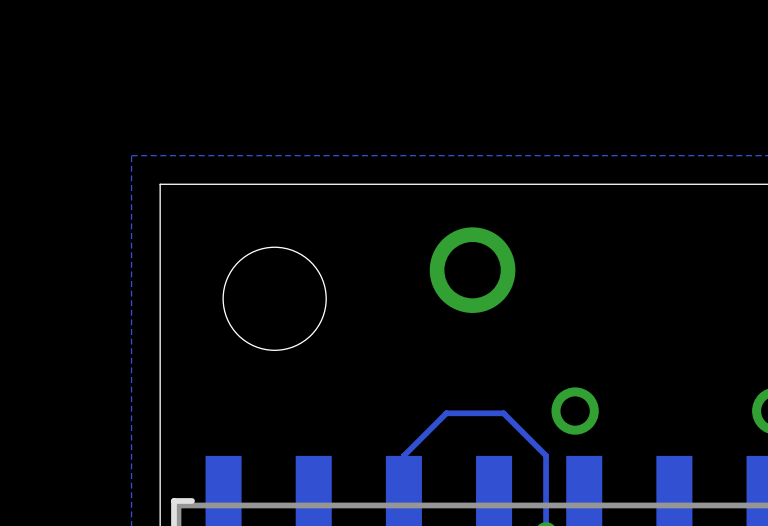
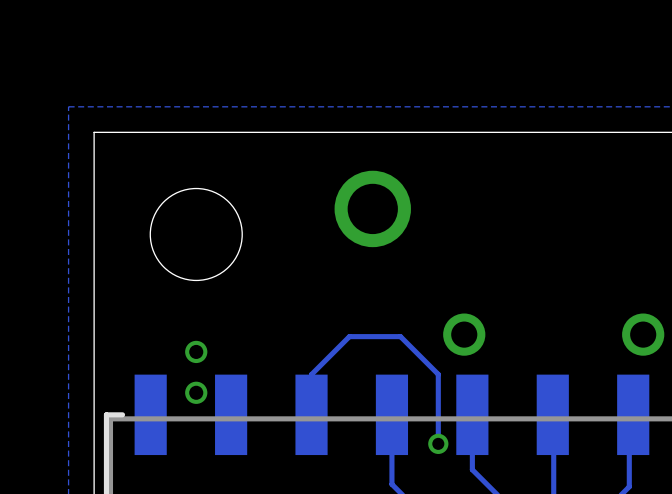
via: none -> (196, 351)
via: none -> (196, 392)

